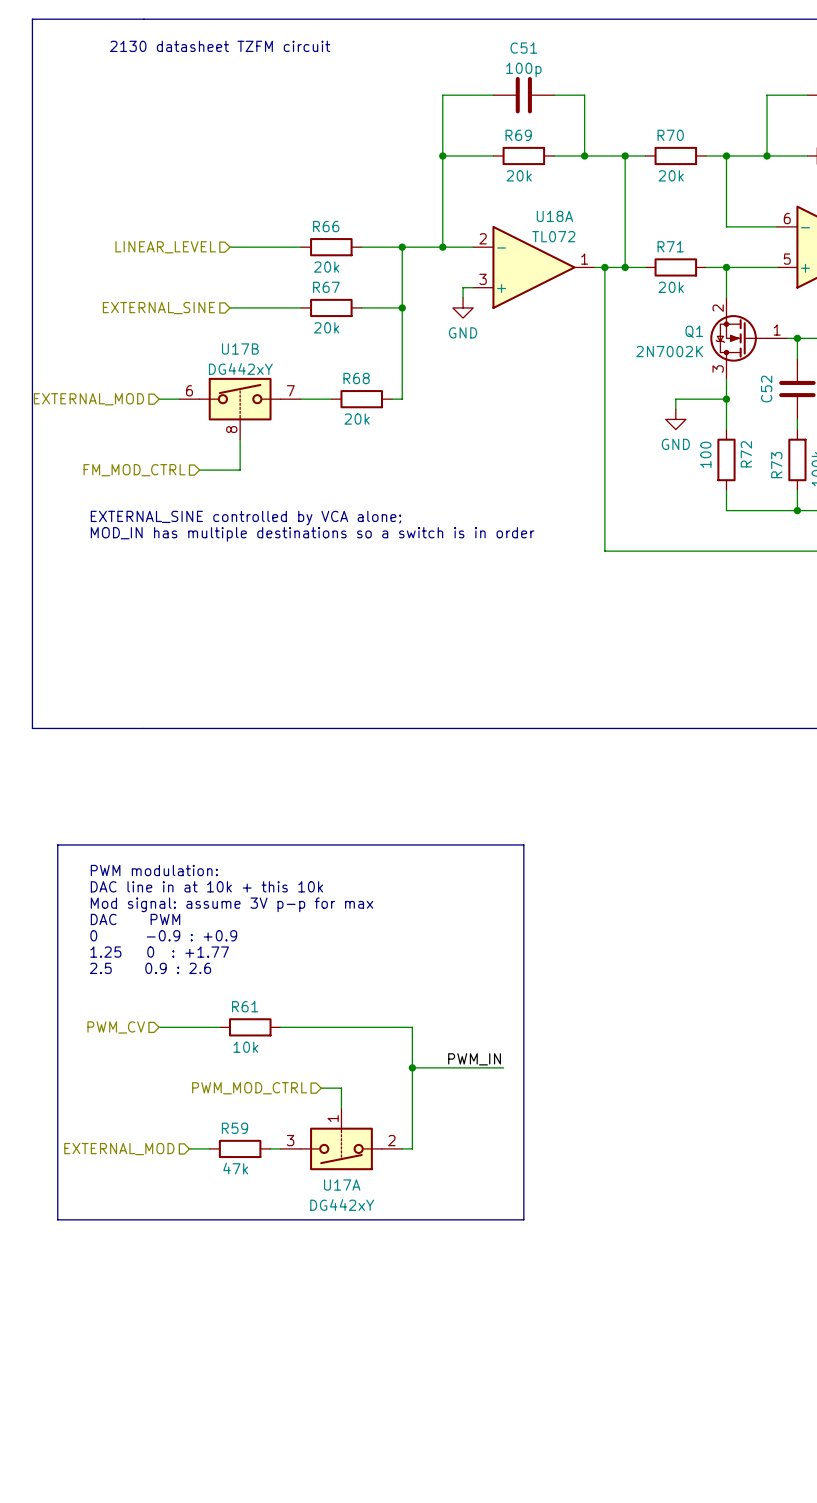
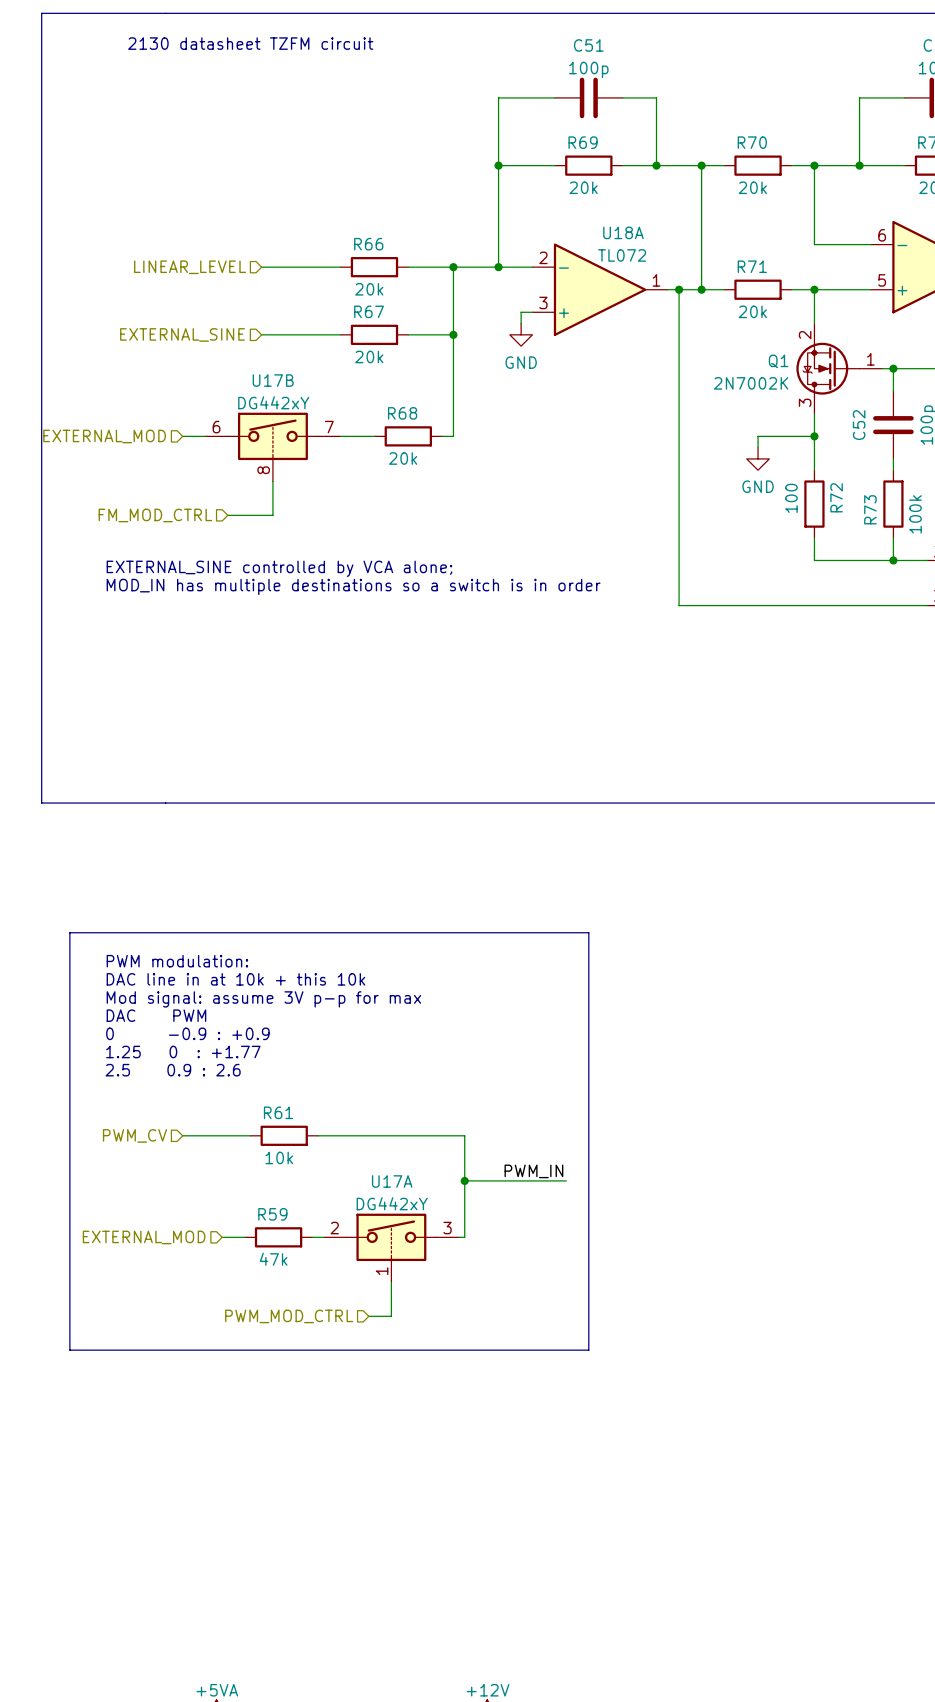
hierarchical label position: PWM_MOD_CTRL (249, 1088) -> PWM_MOD_CTRL (289, 1316)
wire: (321, 1088) (341, 1088) (341, 1108) -> none
wire: (412, 1118) (412, 1148) (402, 1148) -> (464, 1237) (459, 1237)
wire: (189, 1148) (209, 1148) -> (222, 1237) (244, 1237)
R59 position: (240, 1148) -> (278, 1237)
wire: (270, 1148) (280, 1148) -> (312, 1237) (323, 1237)
U17A rotation: 0° (341, 1148) -> 180° (391, 1237)
hierarchical label position: EXTERNAL_MOD (119, 1149) -> EXTERNAL_MOD (144, 1237)
wire: none -> (391, 1282) (391, 1316) (368, 1316)
U17A value position: DG442xY (342, 1205) -> DG442xY (392, 1203)

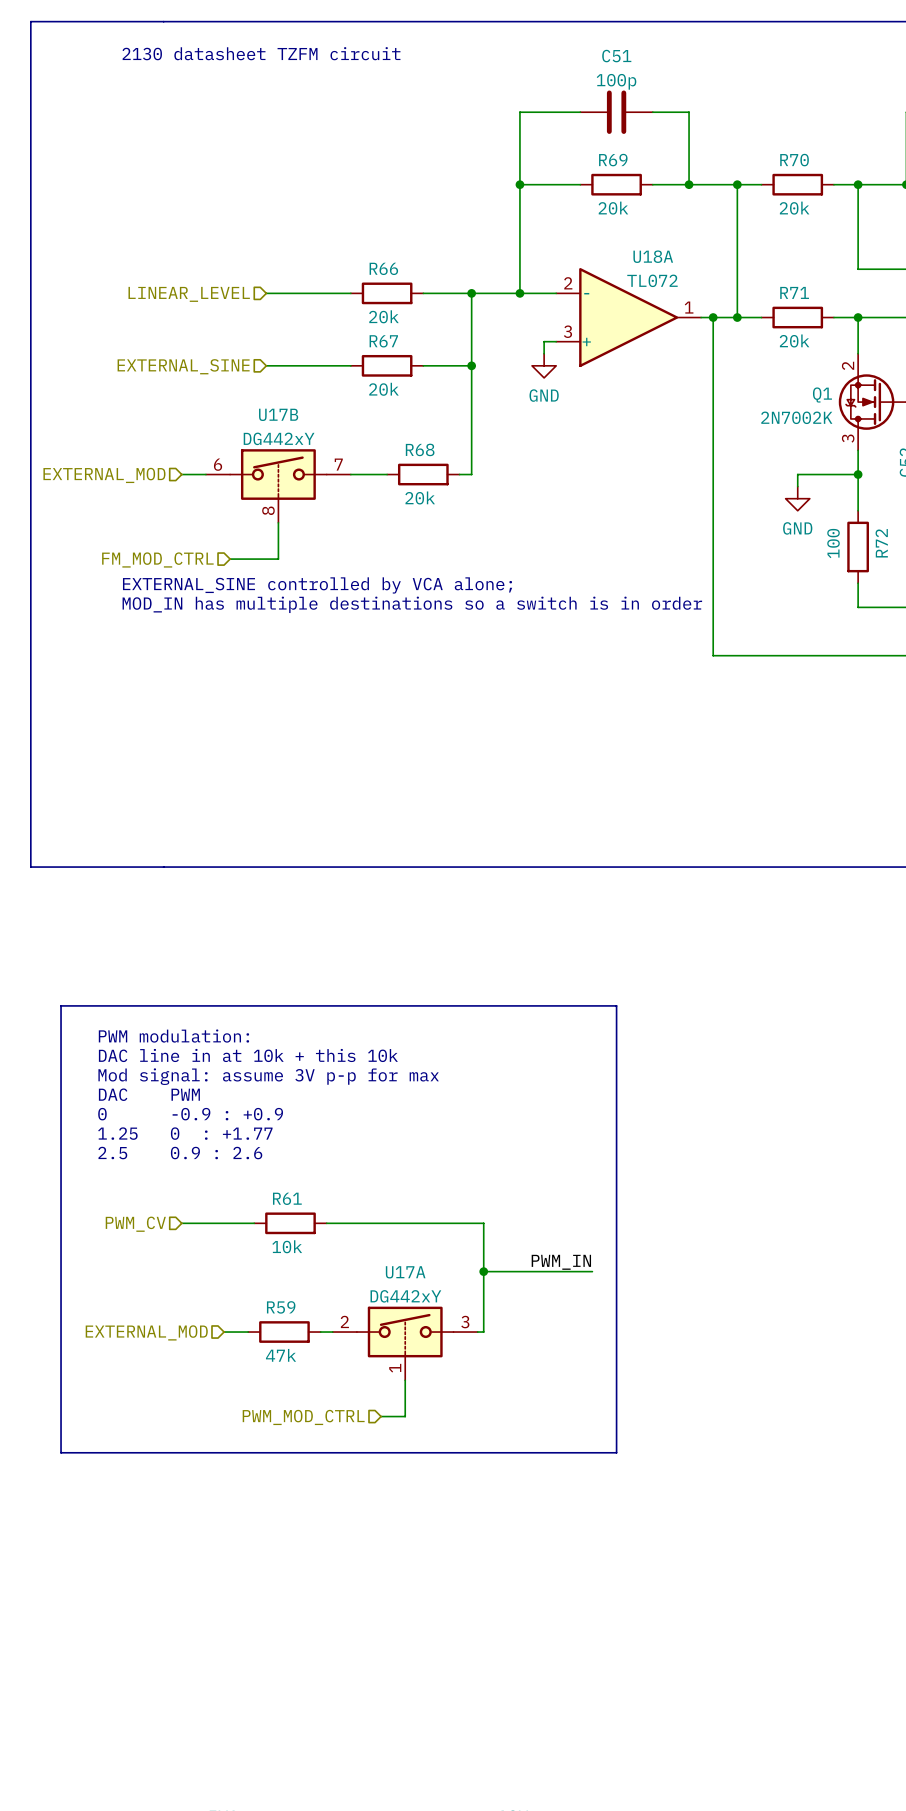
text position: EXTERNAL_SINE controlled by VCA alone; (279, 568) -> EXTERNAL_SINE controlled by VCA alone; (317, 585)
text position: MOD_IN has multiple destinations so a switch is in order (353, 586) -> MOD_IN has multiple destinations so a switch is in order (412, 604)

